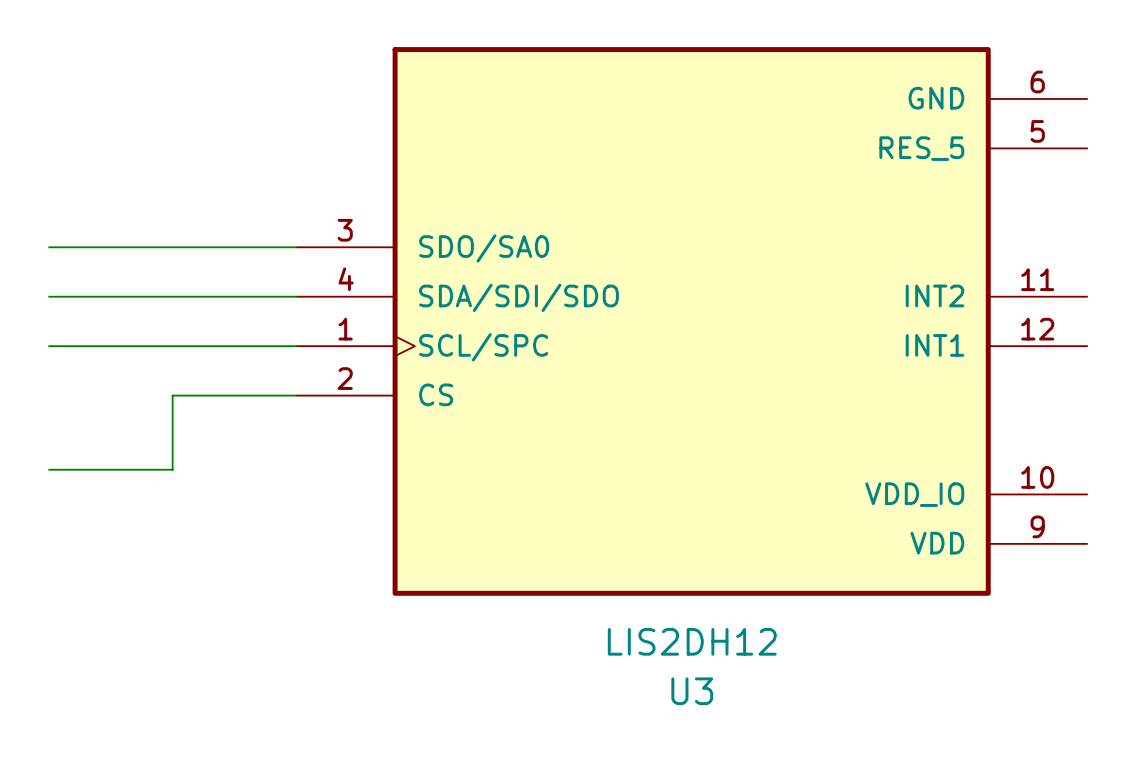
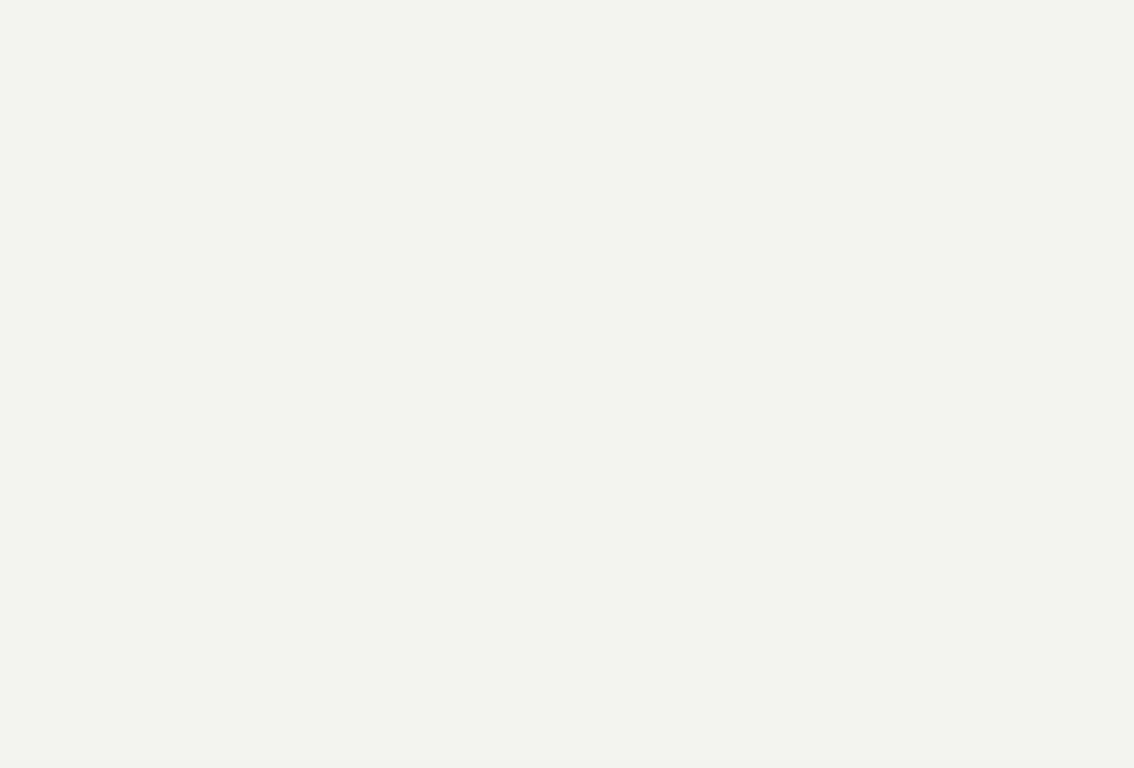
wire: (49, 247) (296, 247) -> none
wire: (49, 296) (296, 296) -> none
U3: LIS2DH12 (691, 321) -> none
wire: (49, 346) (296, 346) -> none
wire: (296, 395) (172, 395) (172, 469) (49, 469) -> none

